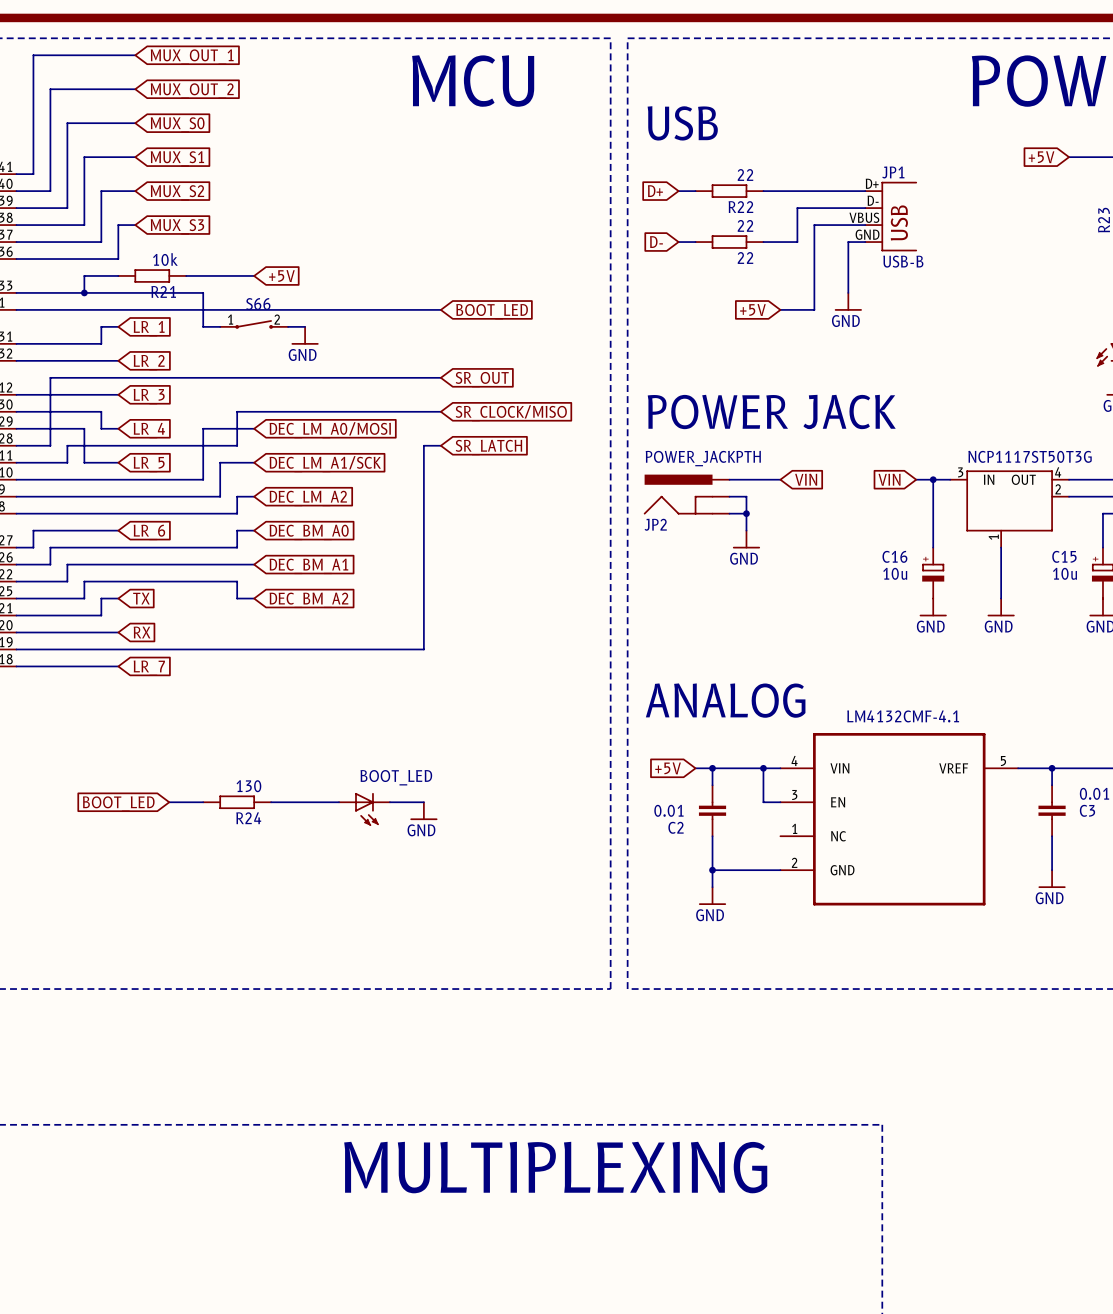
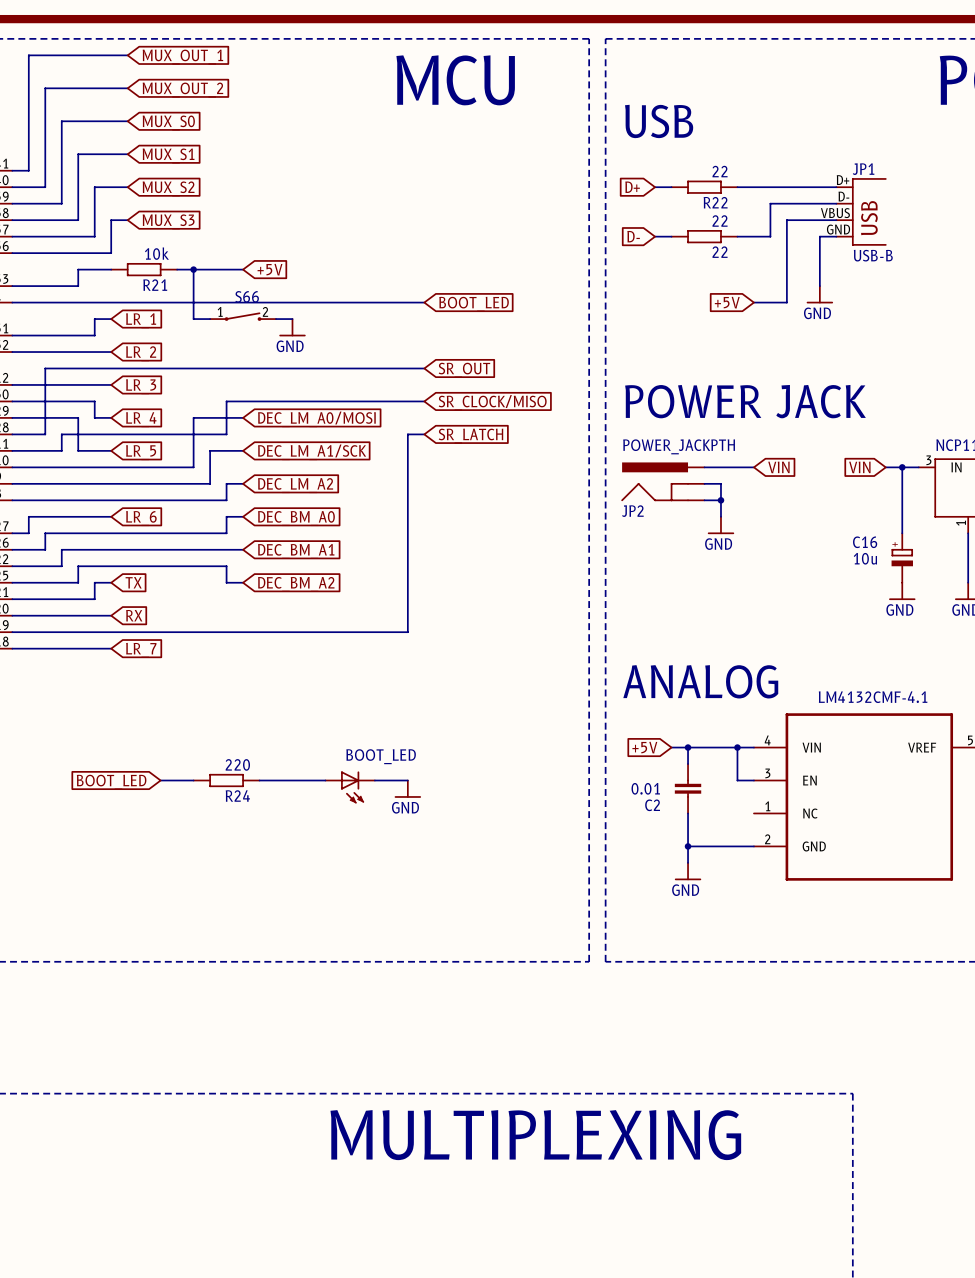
junction: none -> (193, 269)
wire: (84, 292) (203, 292) -> (193, 269) (193, 286)
junction: (84, 292) -> none
R24 value: 130 (248, 786) -> 220 (237, 764)

